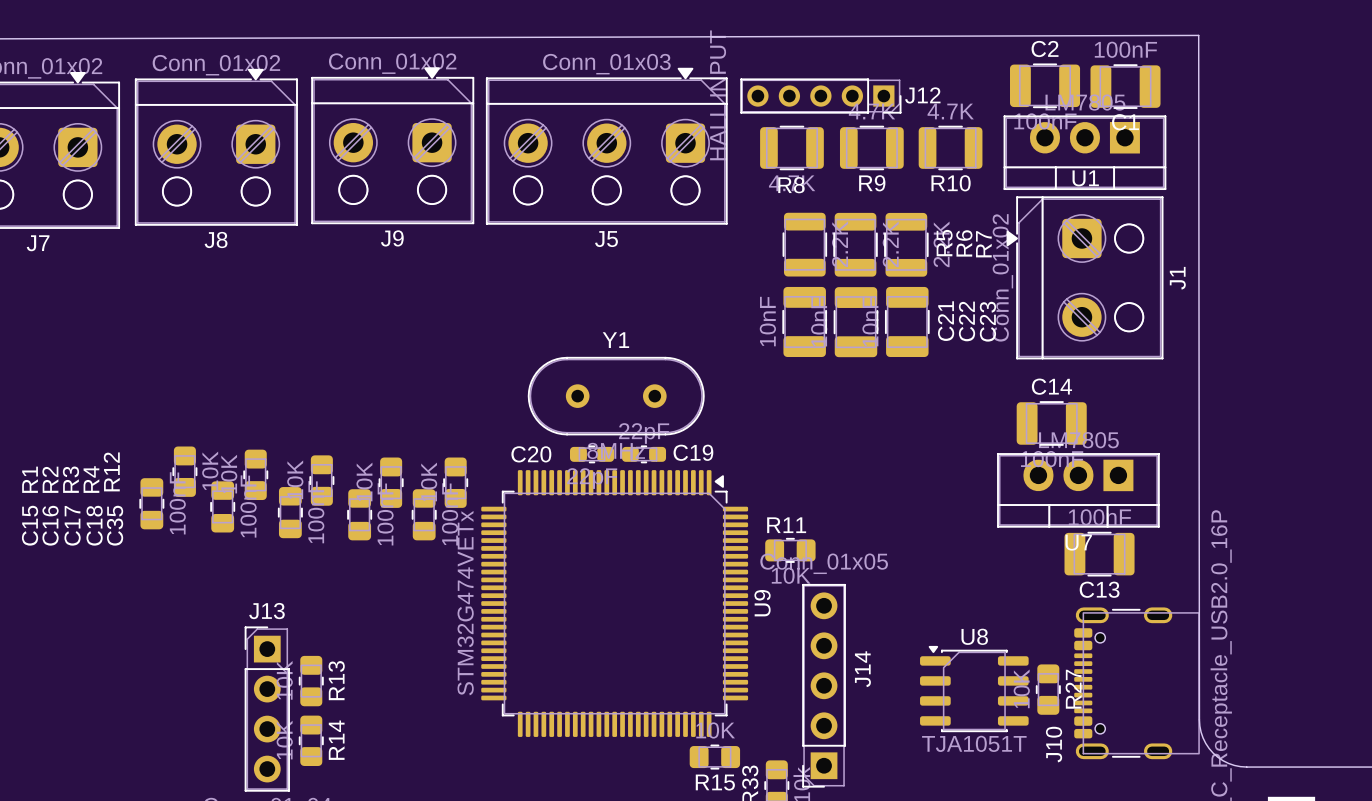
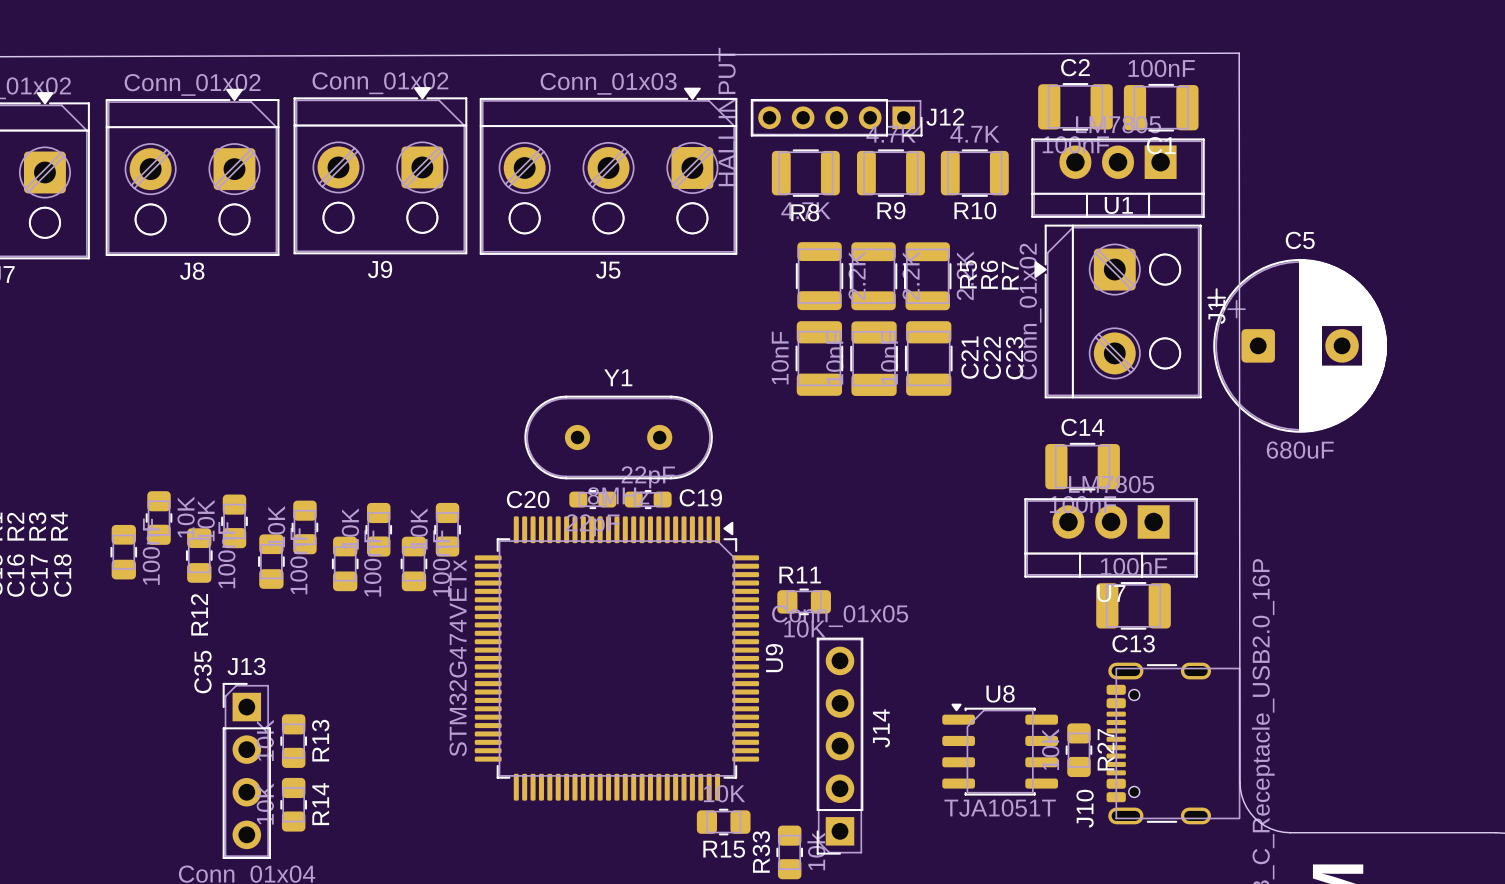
C5: none -> 680uF (1297, 345)
R12 name position: R12 (111, 471) -> R12 (199, 614)
C35 name position: C35 (115, 525) -> C35 (202, 672)

